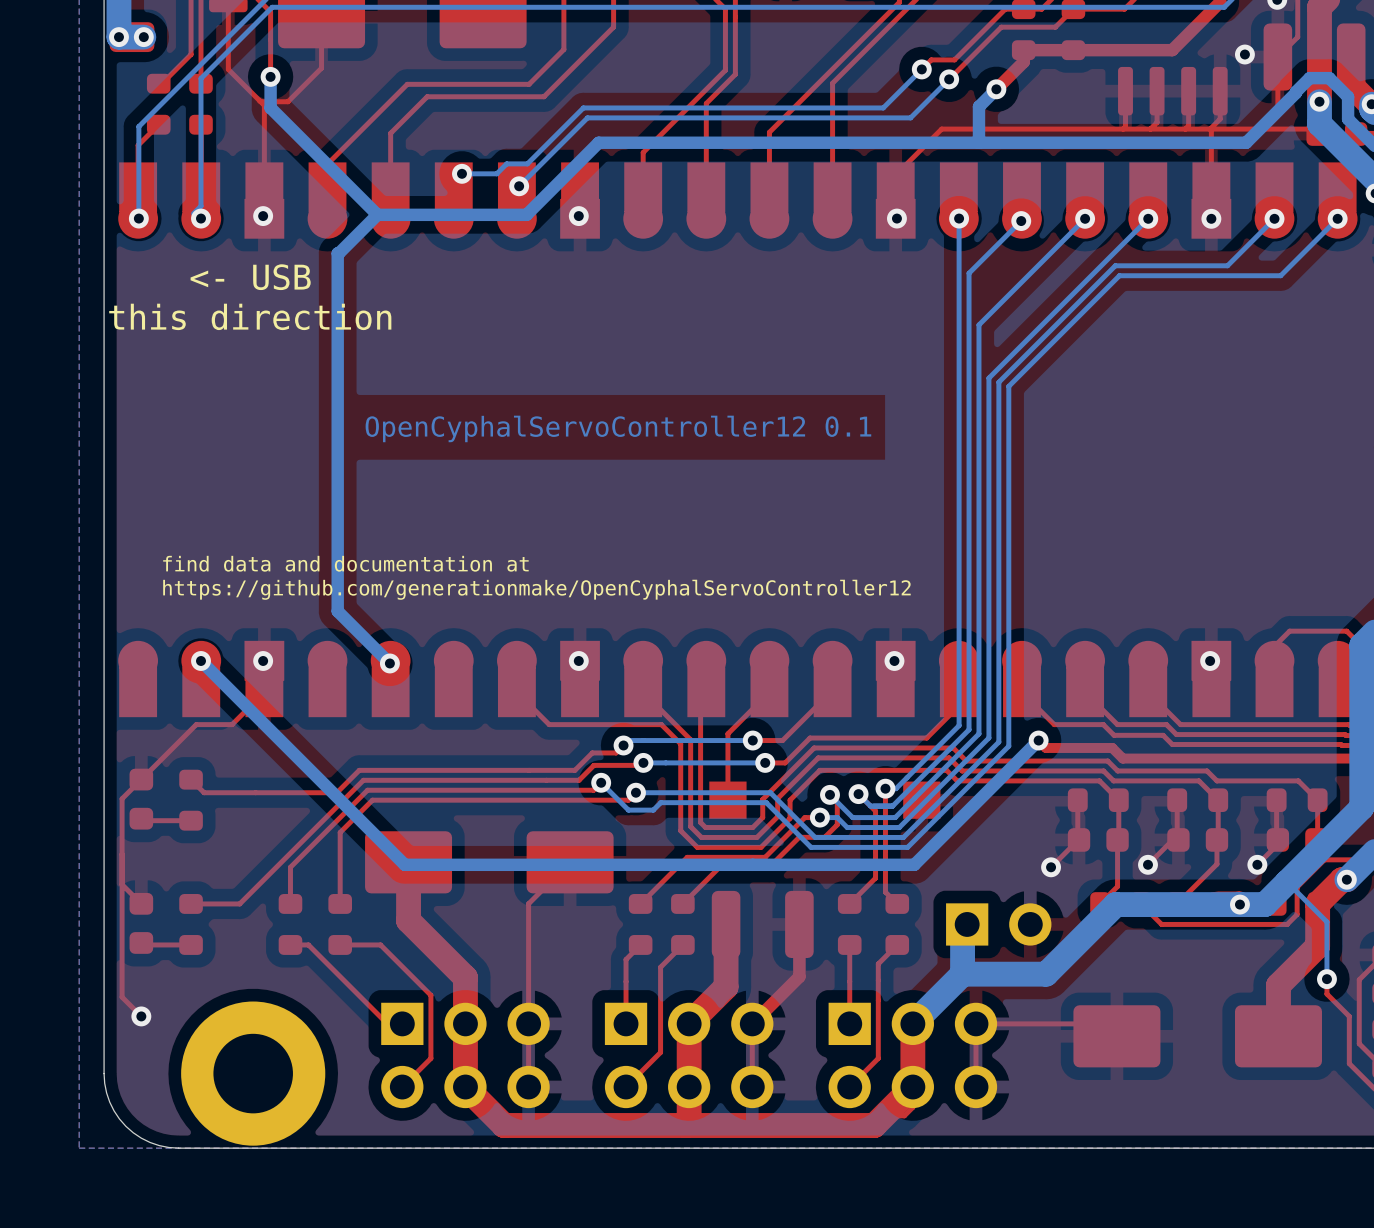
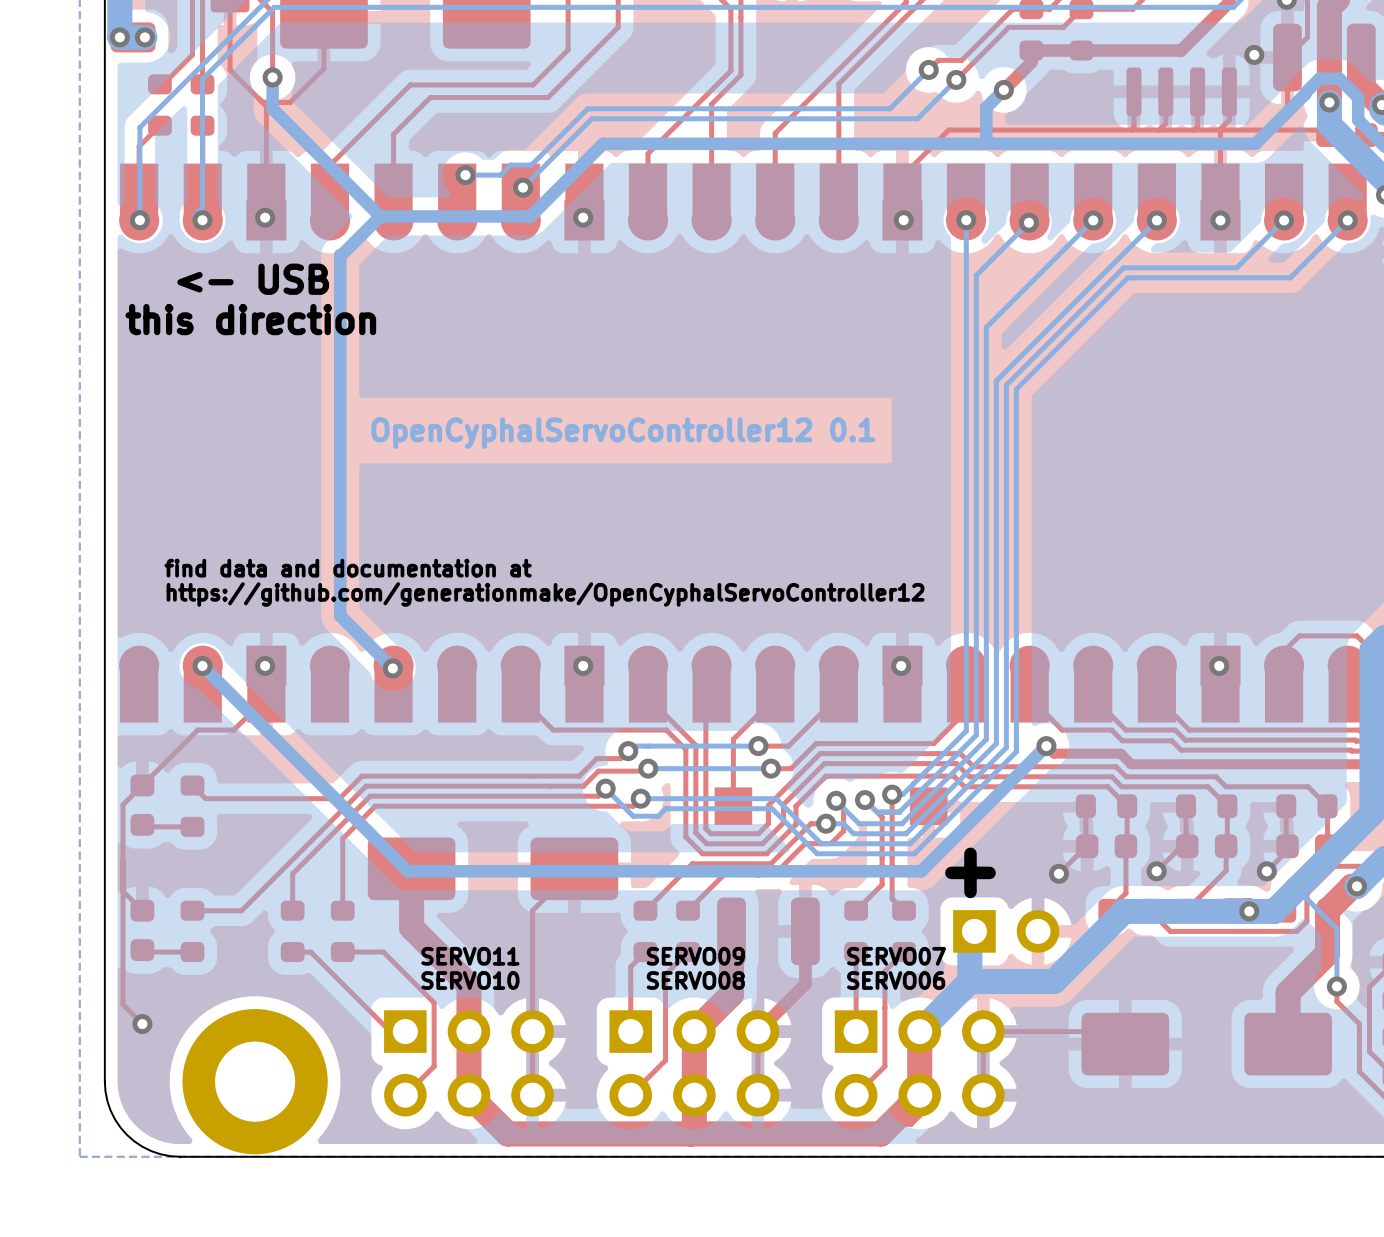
text: none -> + (970, 872)
text: none -> SERVO11 (470, 956)
text: none -> SERVO09 (695, 956)
text: none -> SERVO07 (896, 956)
text: none -> SERVO10 (470, 980)
text: none -> SERVO08 (695, 980)
text: none -> SERVO06 (896, 980)

